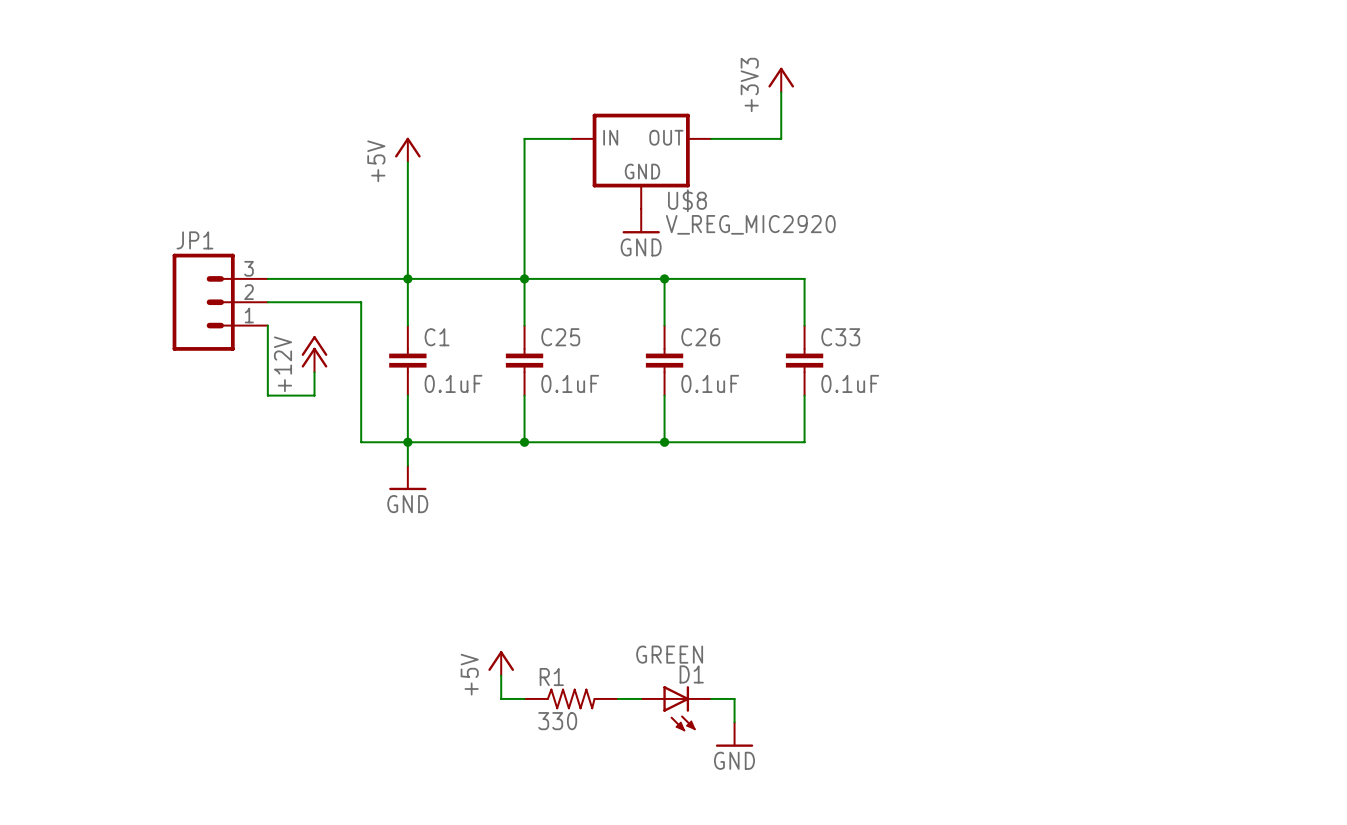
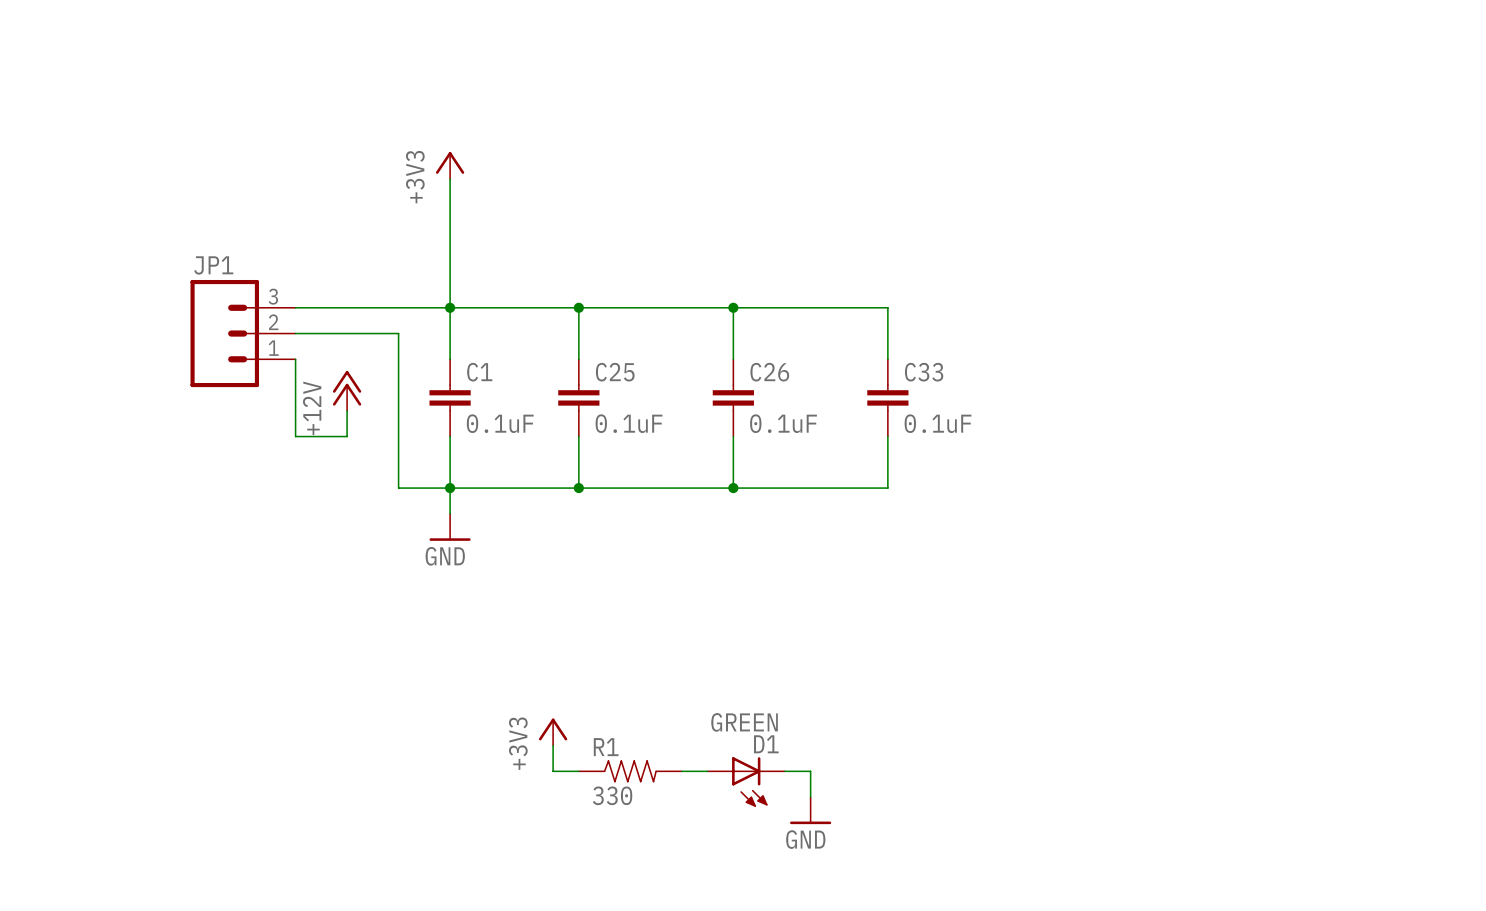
power symbol: +3V3 (781, 79) -> none
wire: (781, 92) (781, 138) (711, 138) -> none
wire: (571, 138) (524, 138) (524, 278) -> none
power symbol: +5V (407, 149) -> +3V3 (450, 165)
U$8: V_REG_MIC2920 (641, 161) -> none
power symbol: GND (641, 221) -> none
power symbol: +5V (501, 663) -> +3V3 (553, 732)

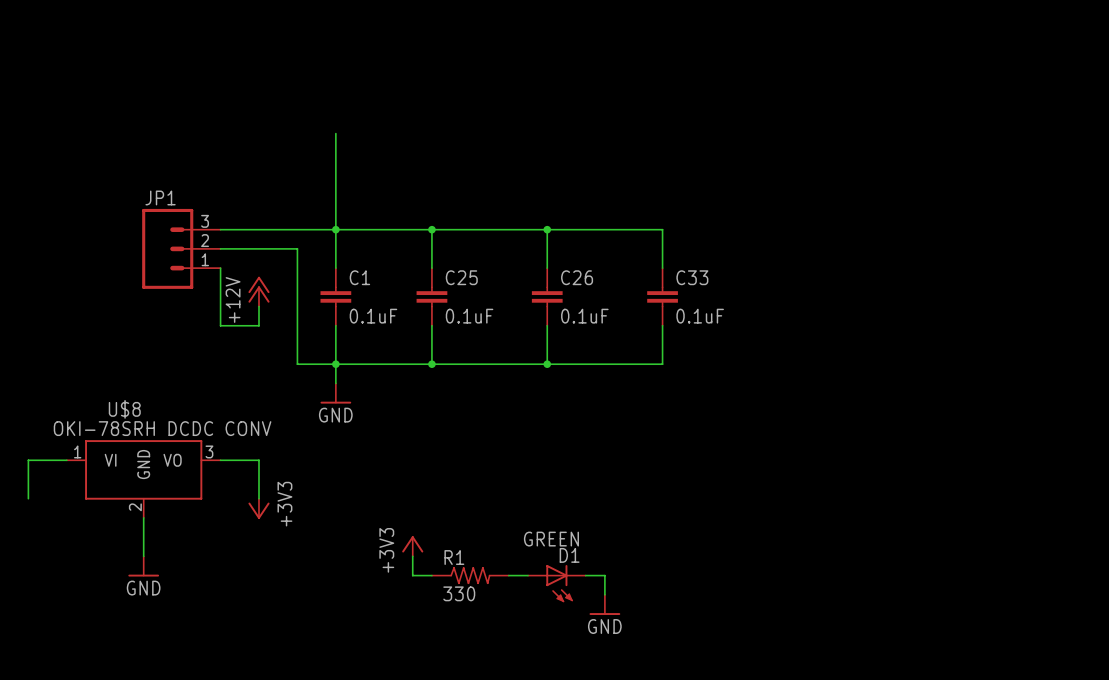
power symbol: +3V3 (450, 165) -> none
wire: none -> (66, 460) (28, 460) (28, 498)
wire: none -> (220, 460) (258, 460) (258, 498)
U$8: none -> (143, 479)
power symbol: none -> +3V3 (258, 508)
wire: none -> (143, 517) (143, 556)
power symbol: none -> GND (143, 566)

